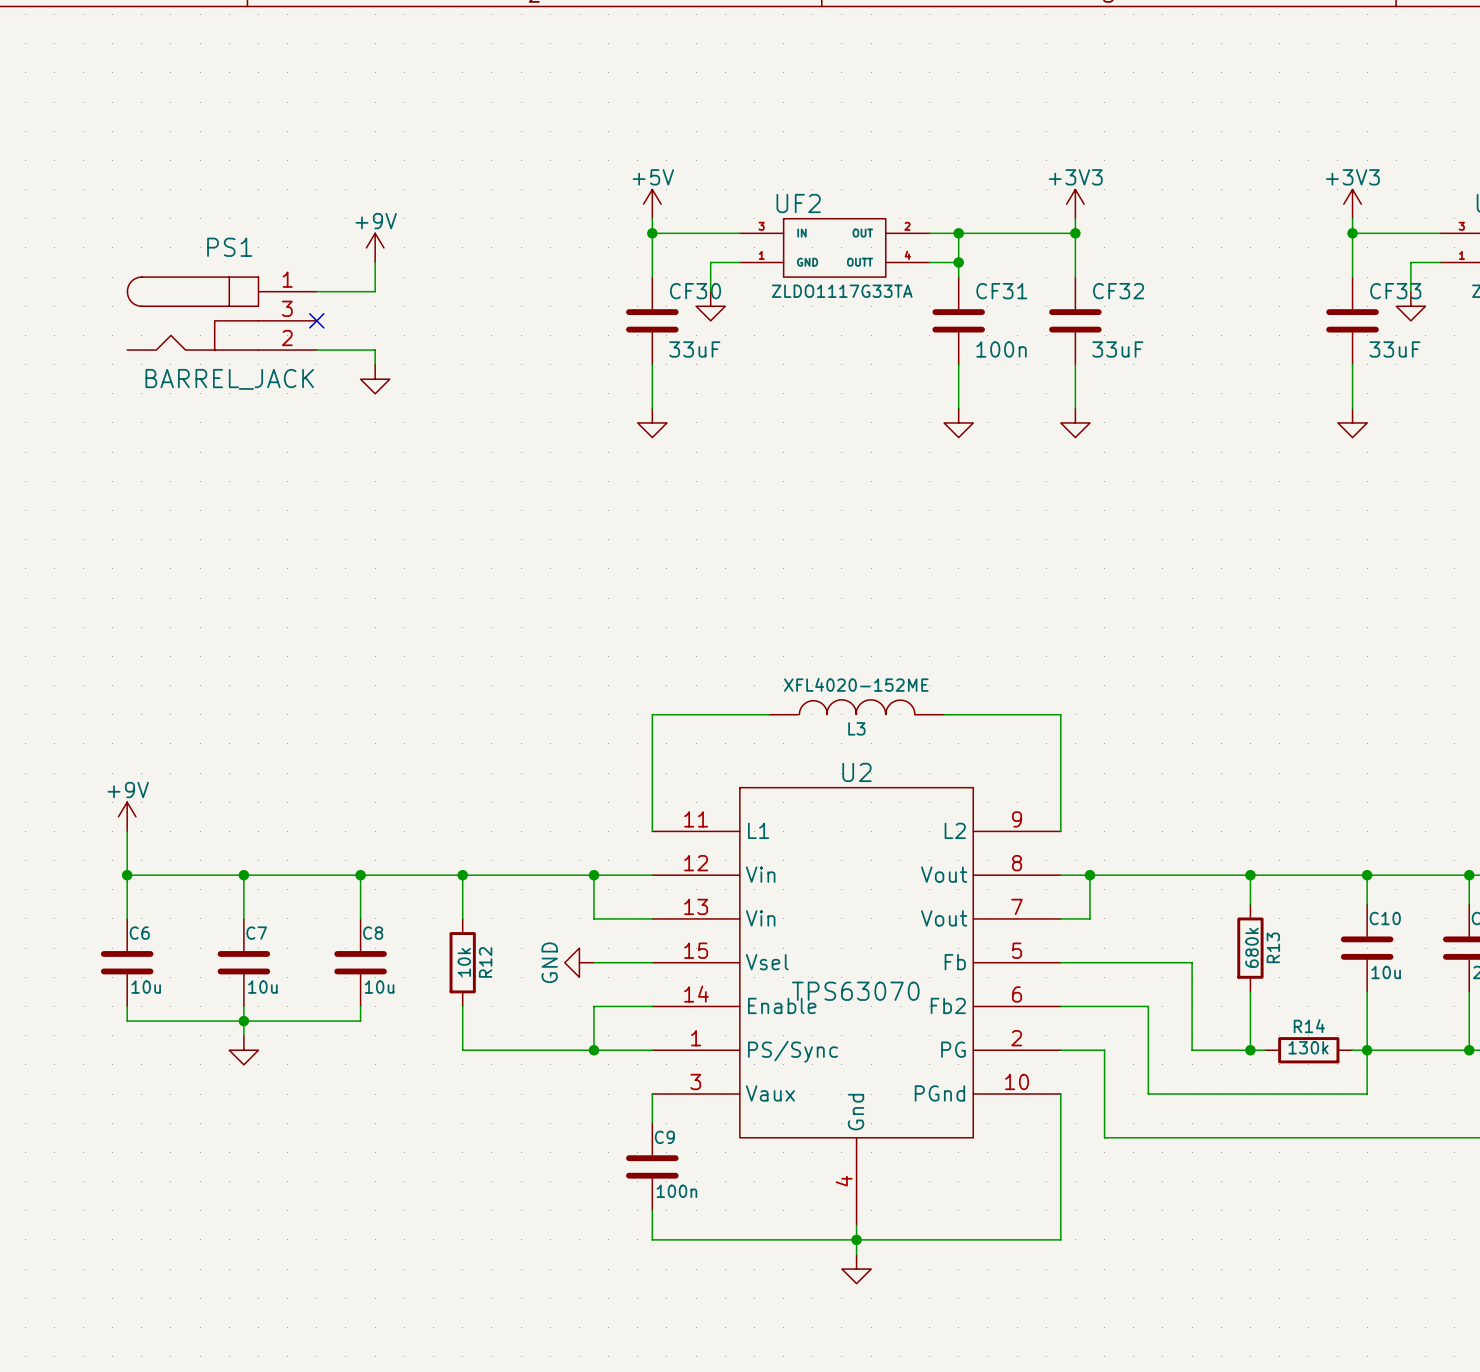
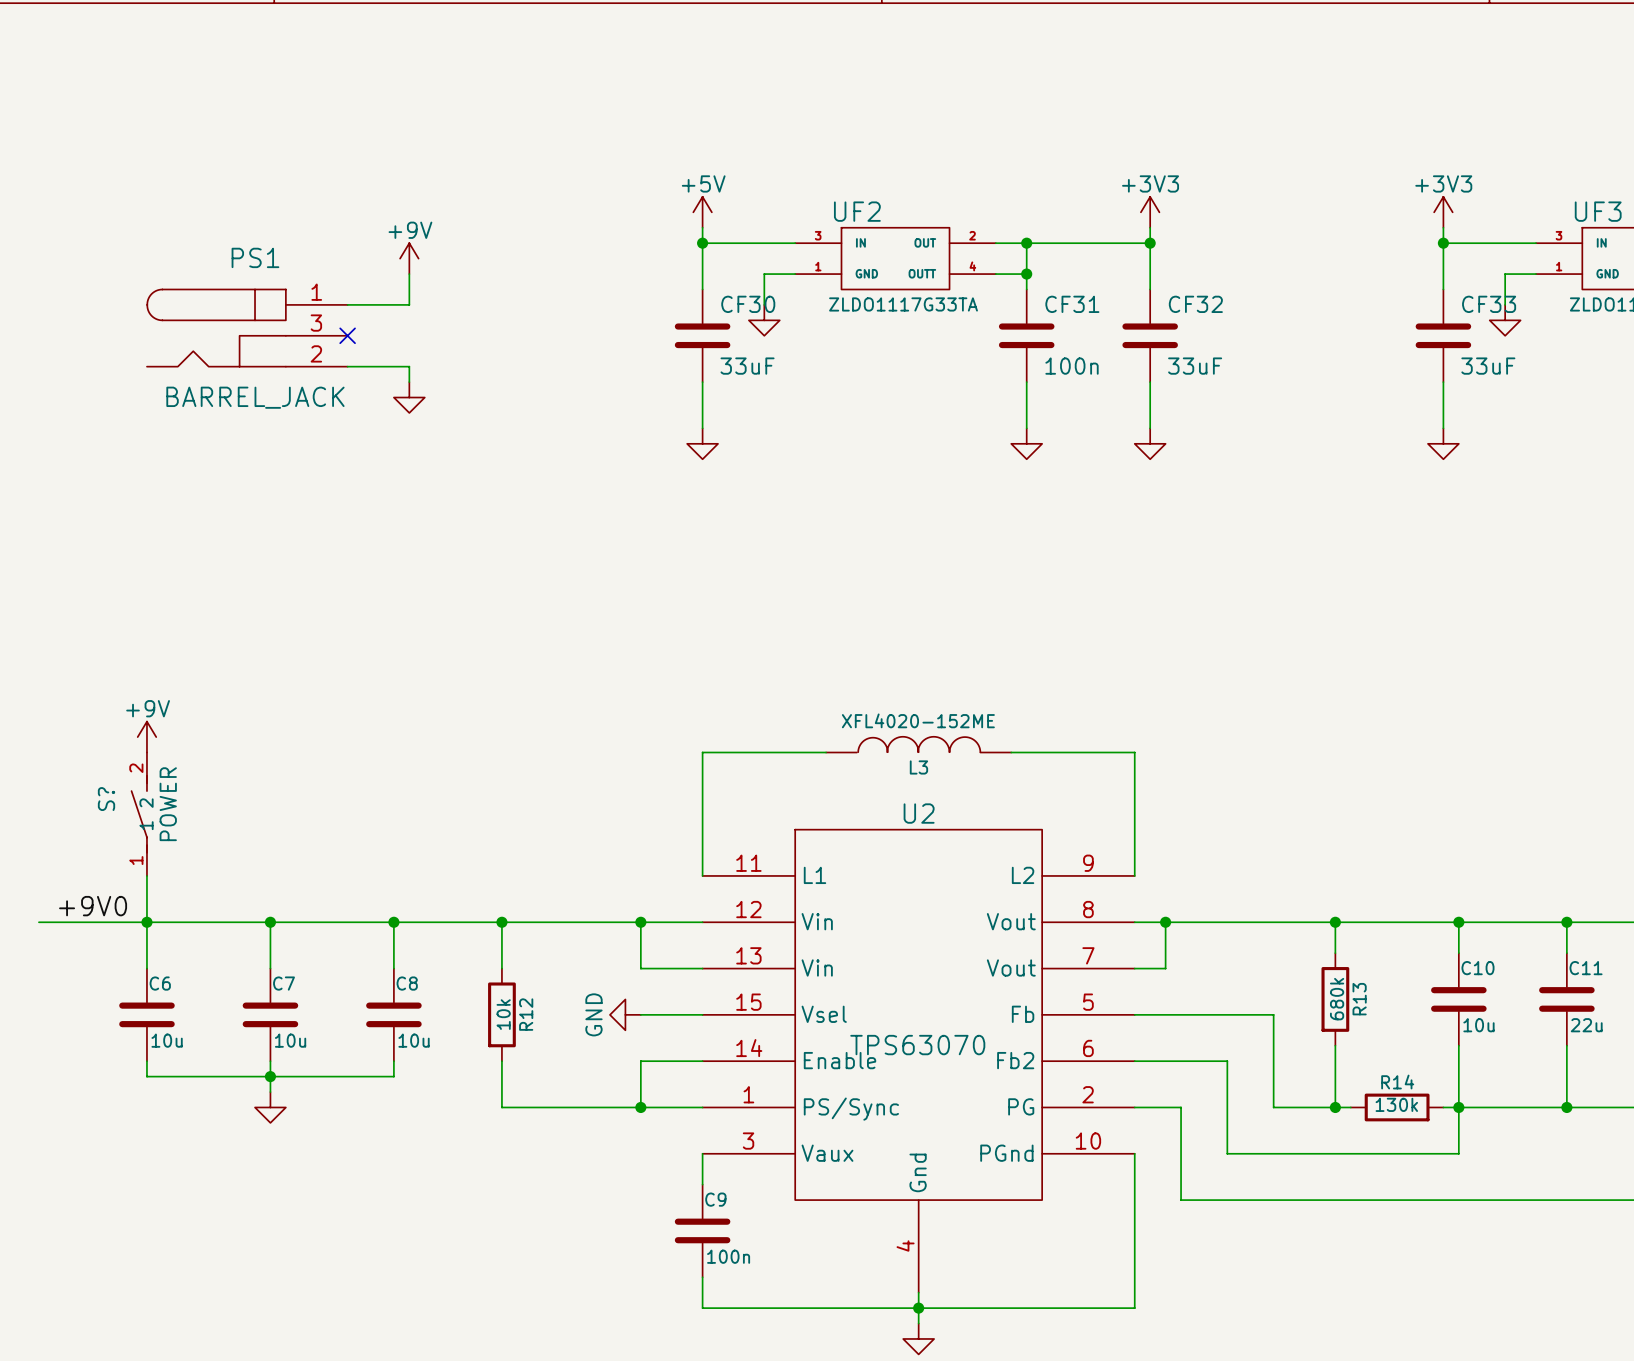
S?: none -> POWER (139, 814)
power symbol position: +9V (127, 816) -> +9V (146, 737)
label: none -> +9V0 (93, 906)
wire: none -> (38, 922) (146, 922)

